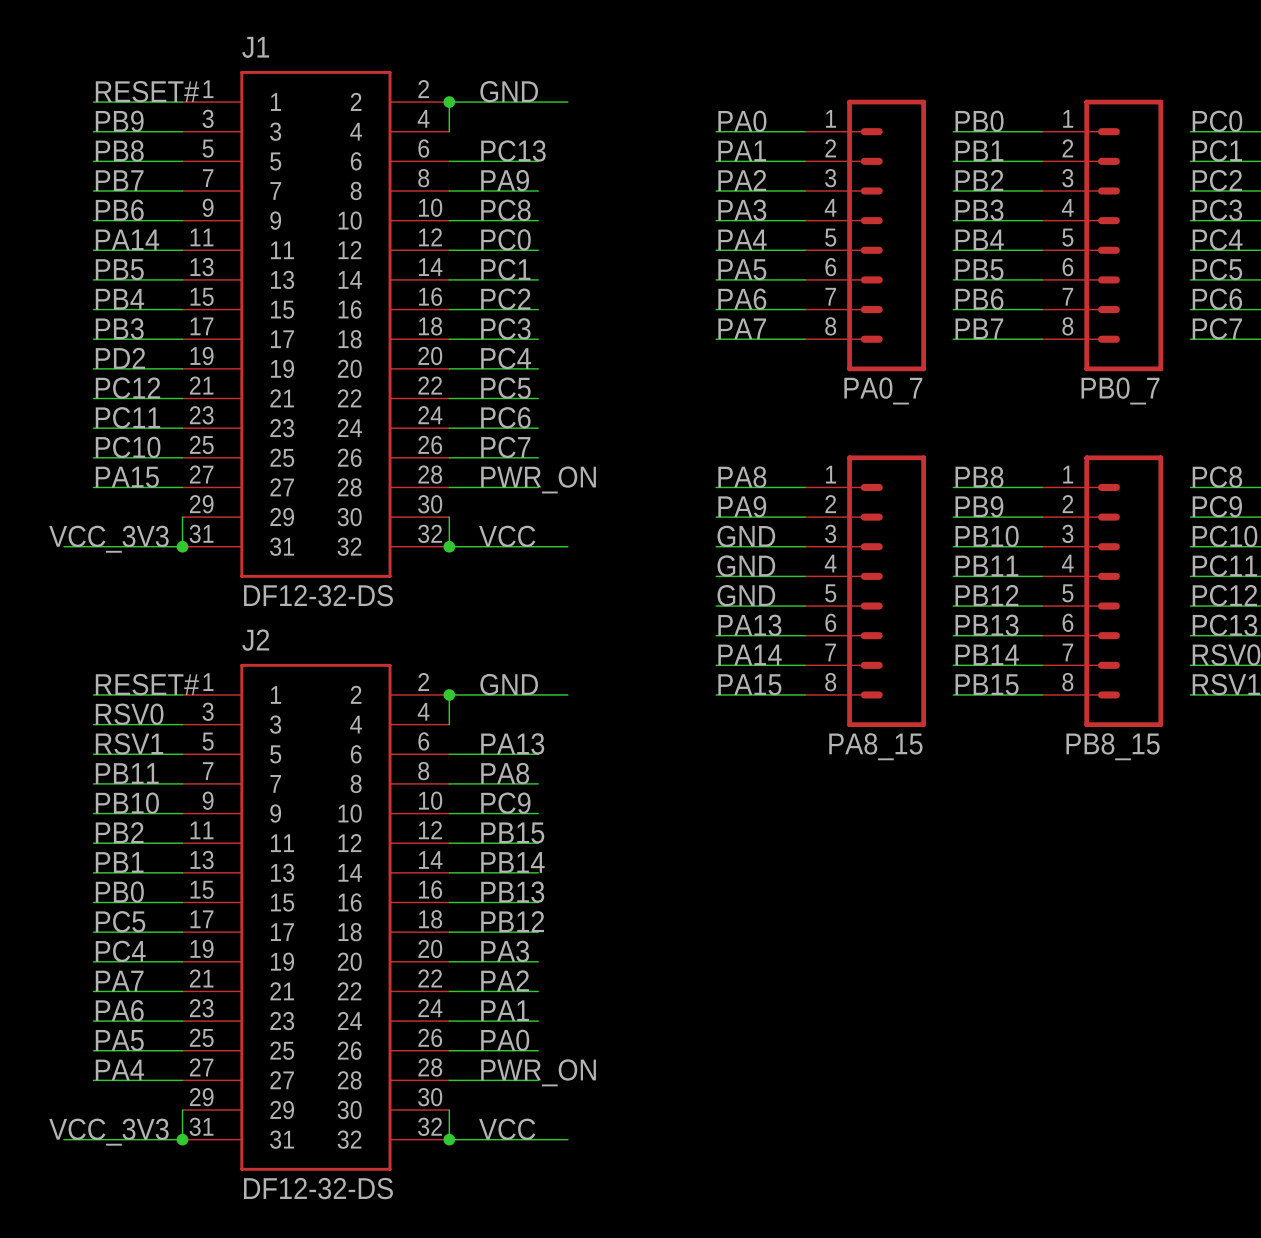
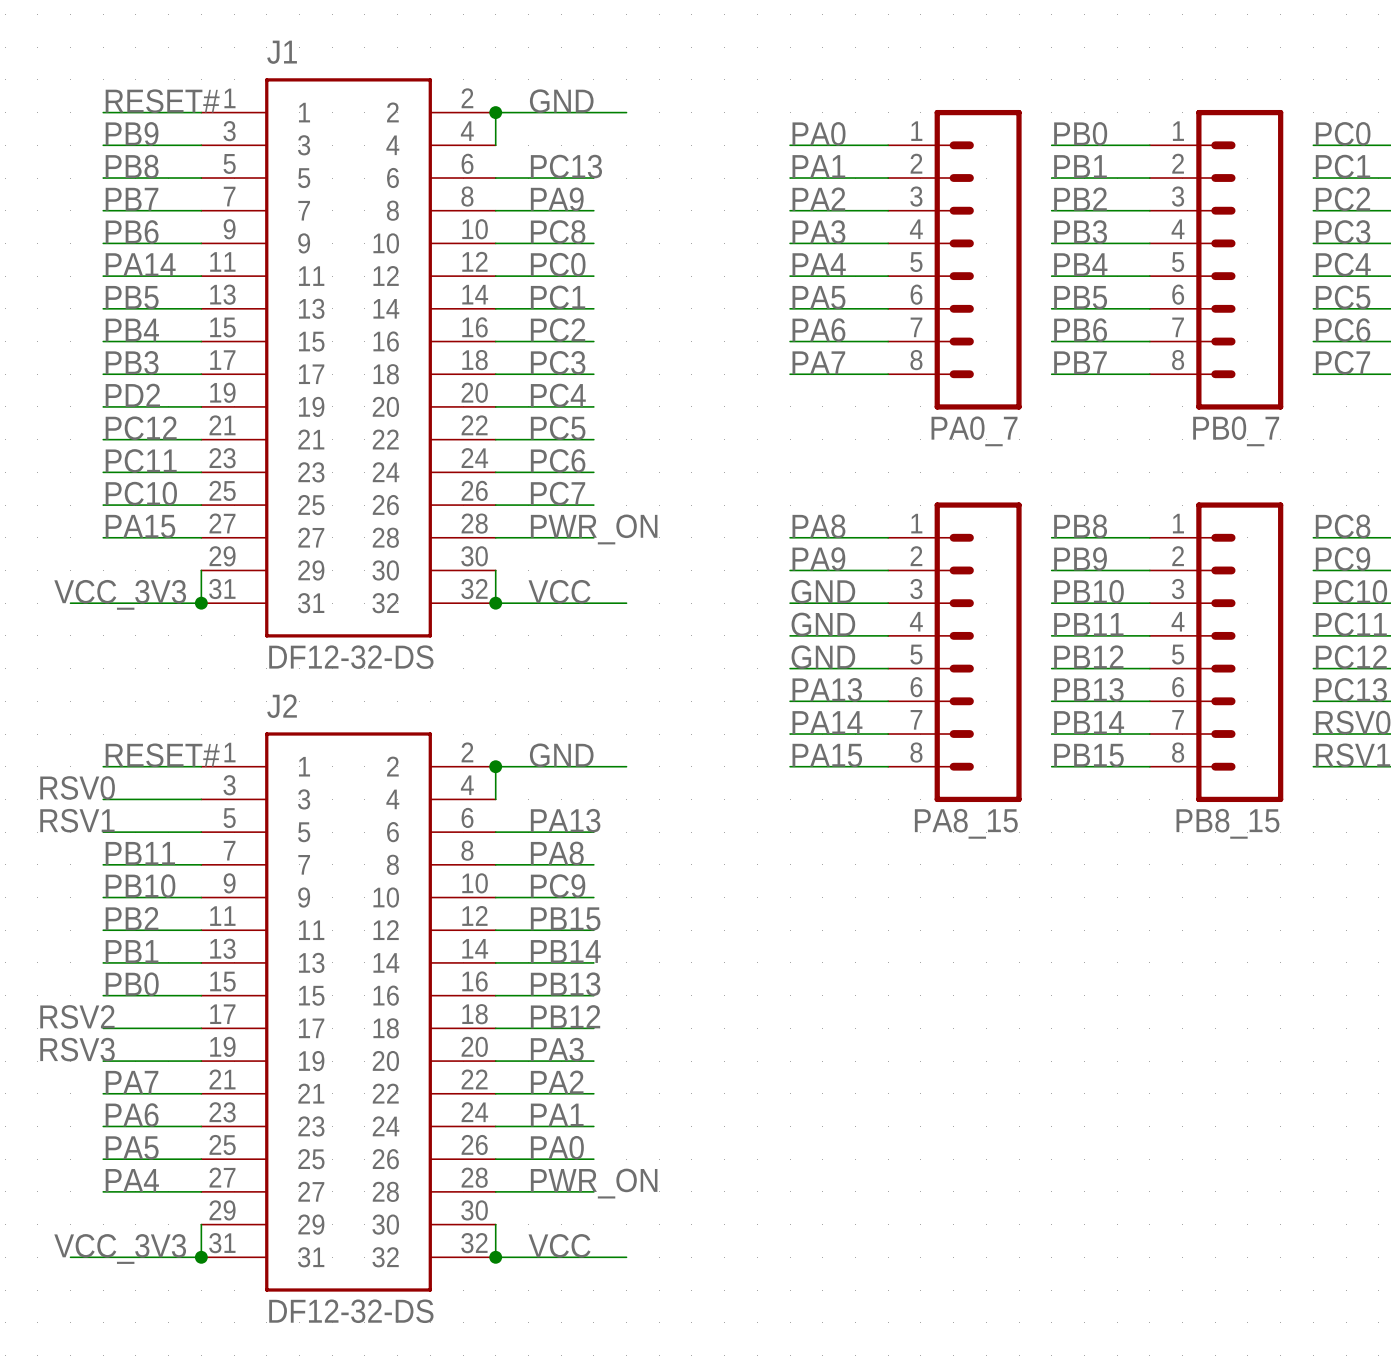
label position: RSV0 (129, 714) -> RSV0 (77, 787)
label position: RSV1 (129, 743) -> RSV1 (77, 820)
label: none -> RSV2 (77, 1016)
label: PC5 (120, 921) -> none
label: none -> RSV3 (77, 1049)
label: PC4 (120, 951) -> none

